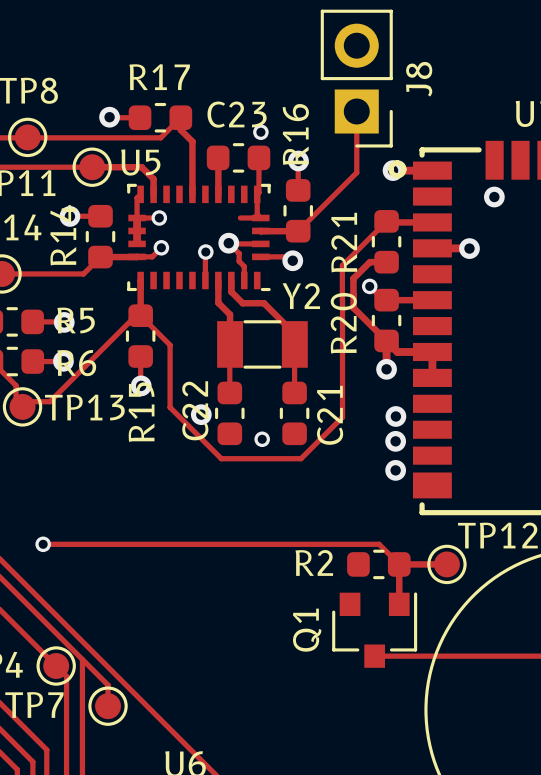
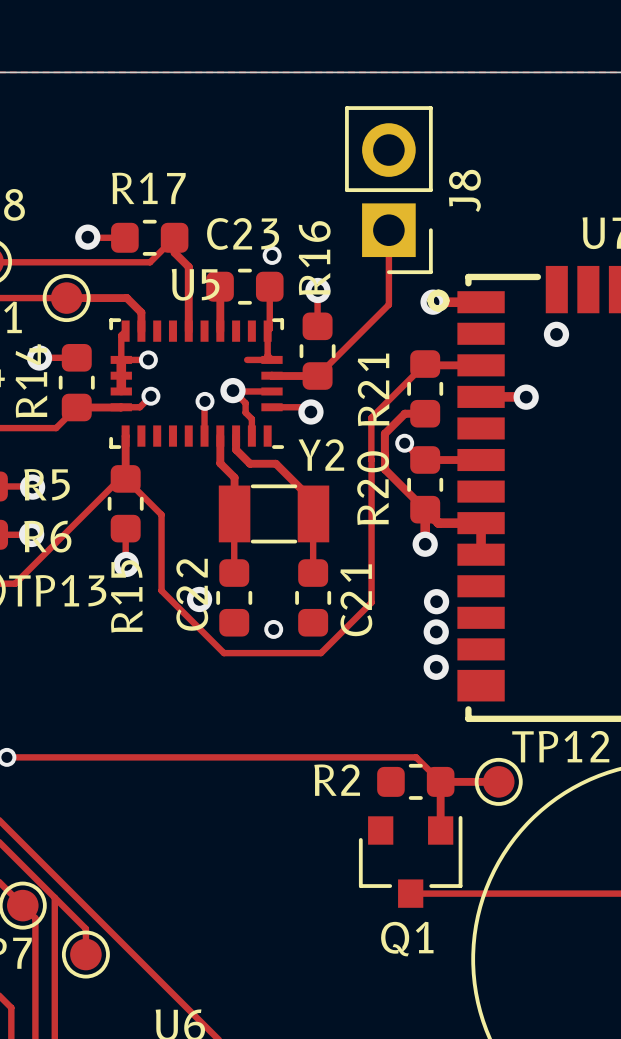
U5 name position: U5 (140, 162) -> U5 (195, 284)
Q1 name rotation: 0° (307, 630) -> 90° clockwise (407, 939)
Q1 name position: Q1 (307, 630) -> Q1 (407, 939)

